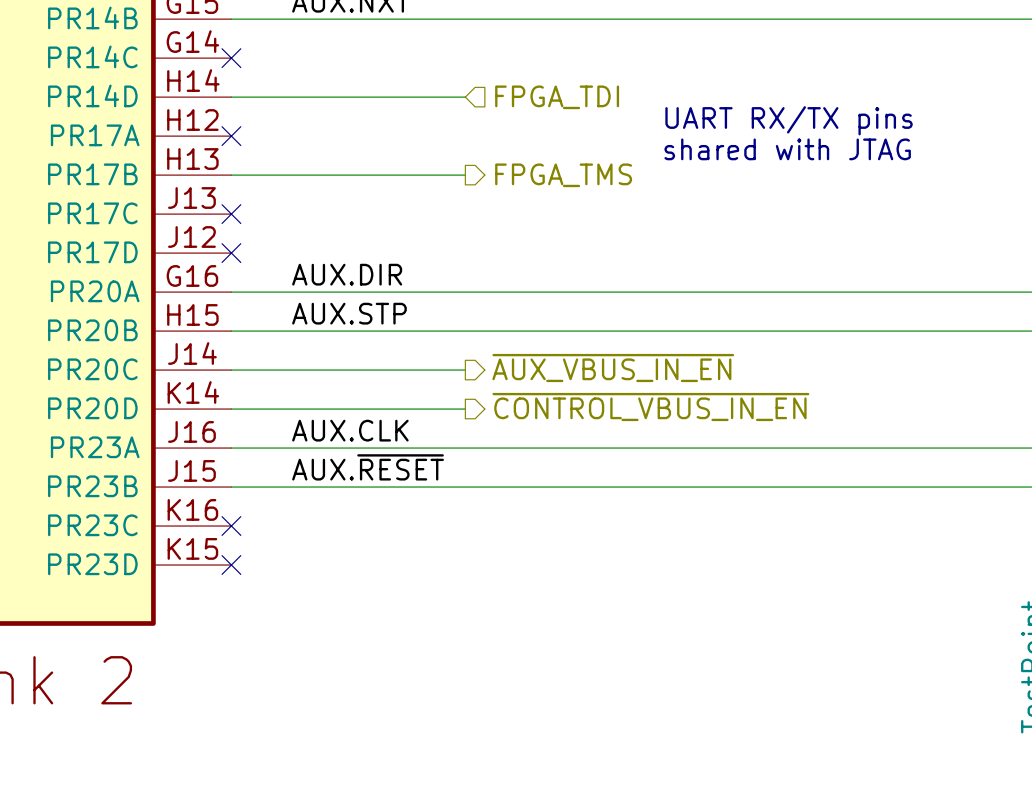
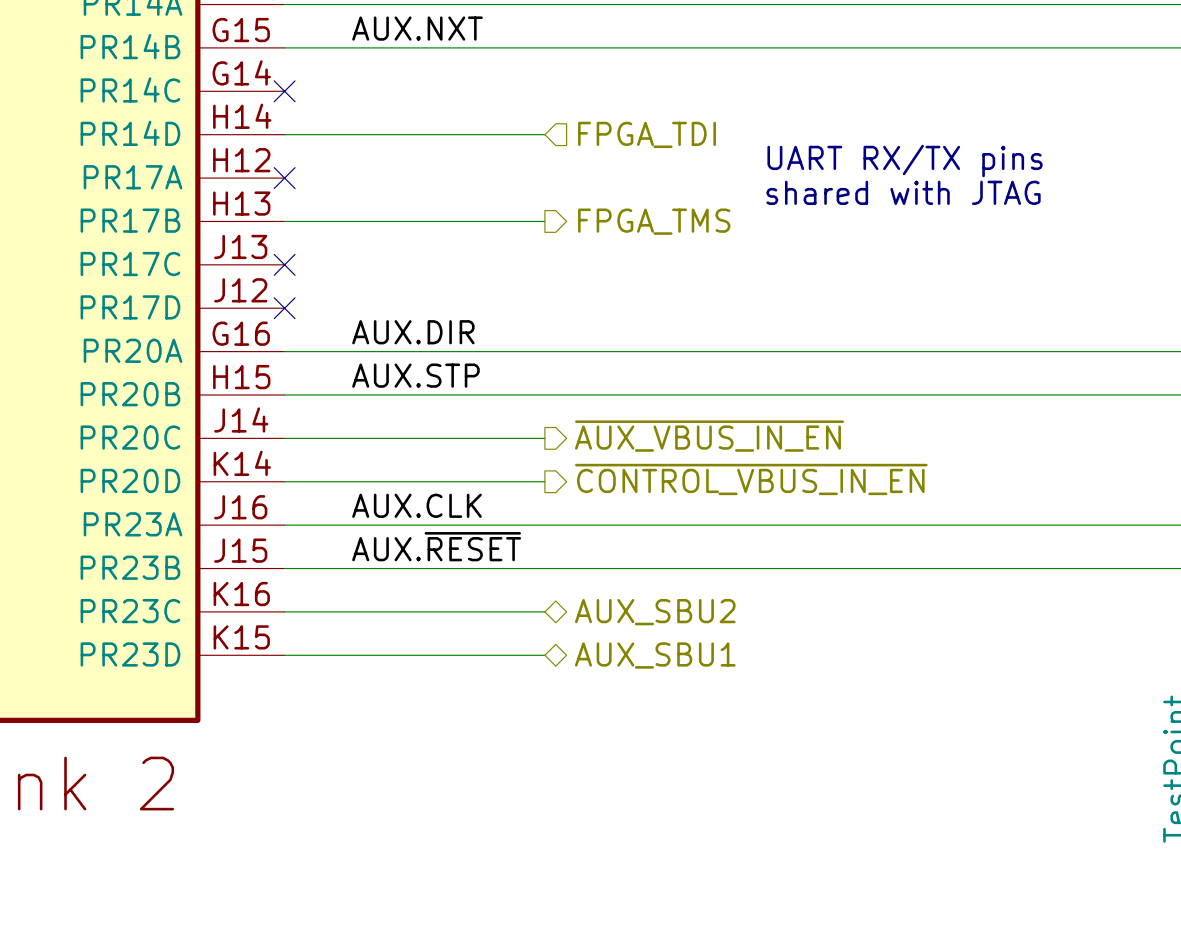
wire: none -> (284, 611) (544, 611)
no-connect mark: (231, 526) -> none
hierarchical label: none -> AUX_SBU2 (655, 612)
wire: none -> (284, 655) (544, 655)
no-connect mark: (231, 565) -> none
hierarchical label: none -> AUX_SBU1 (655, 655)

